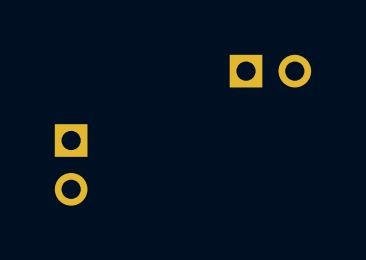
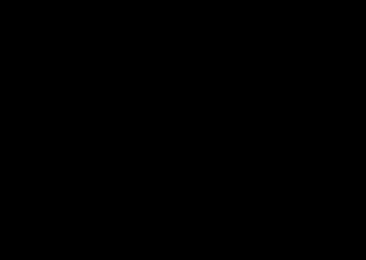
part: (270, 71) -> none
part: (71, 164) -> none

